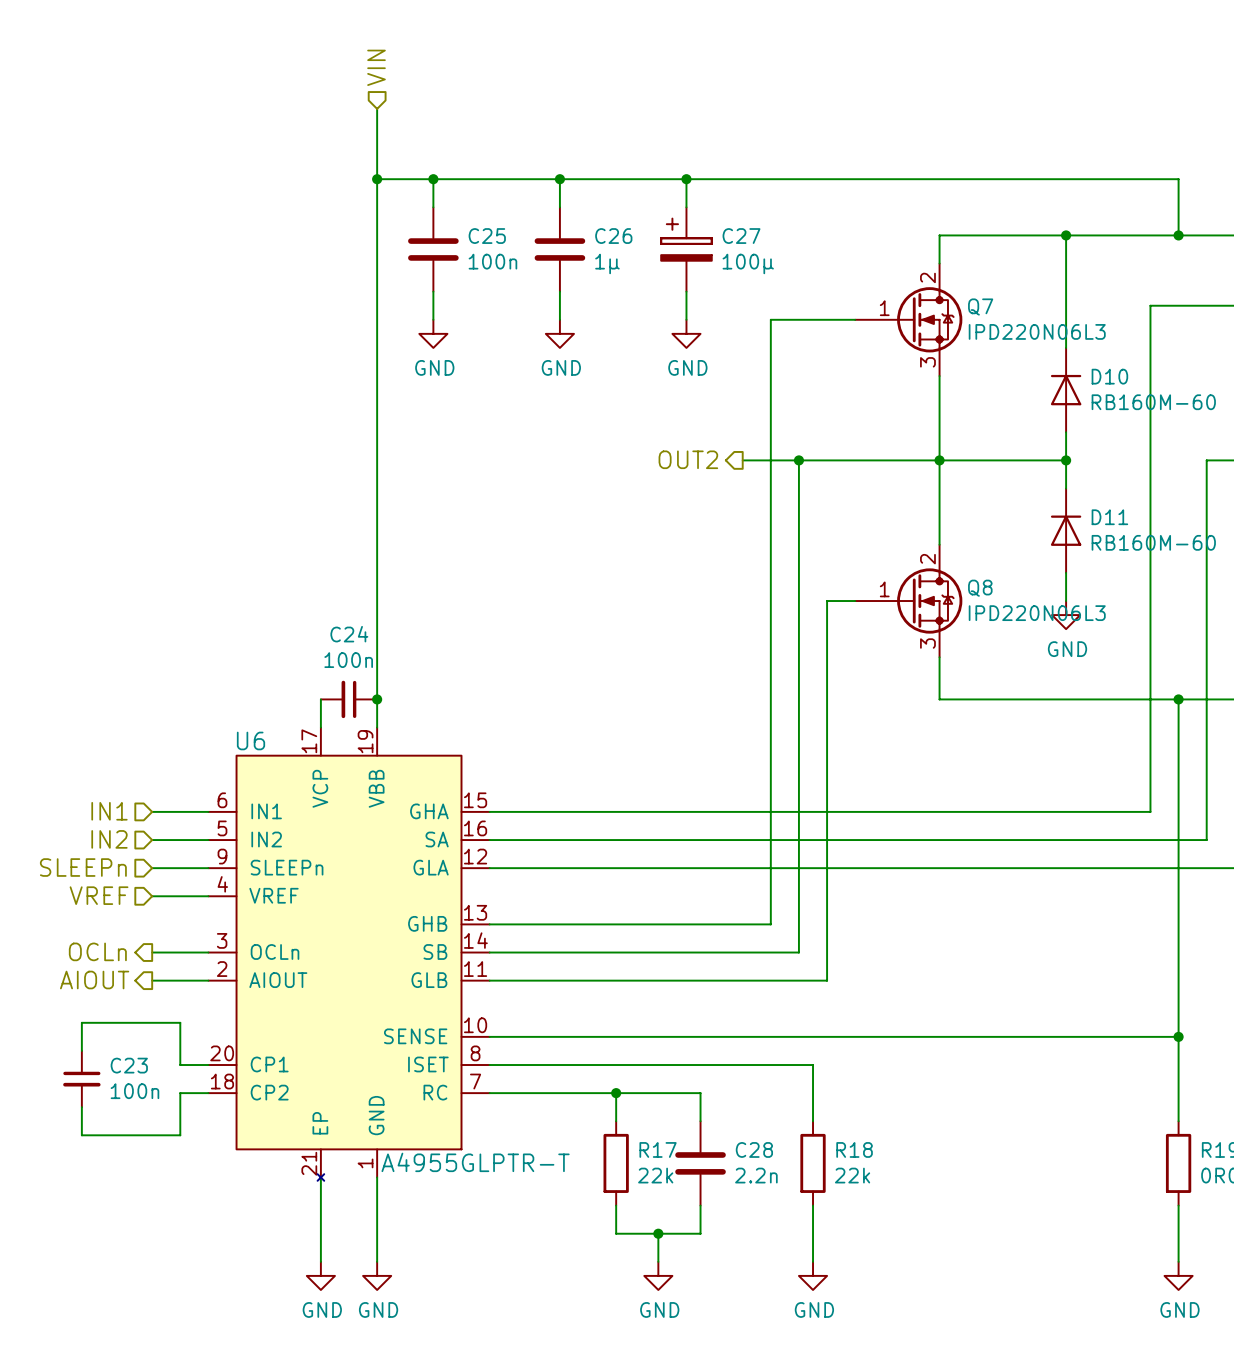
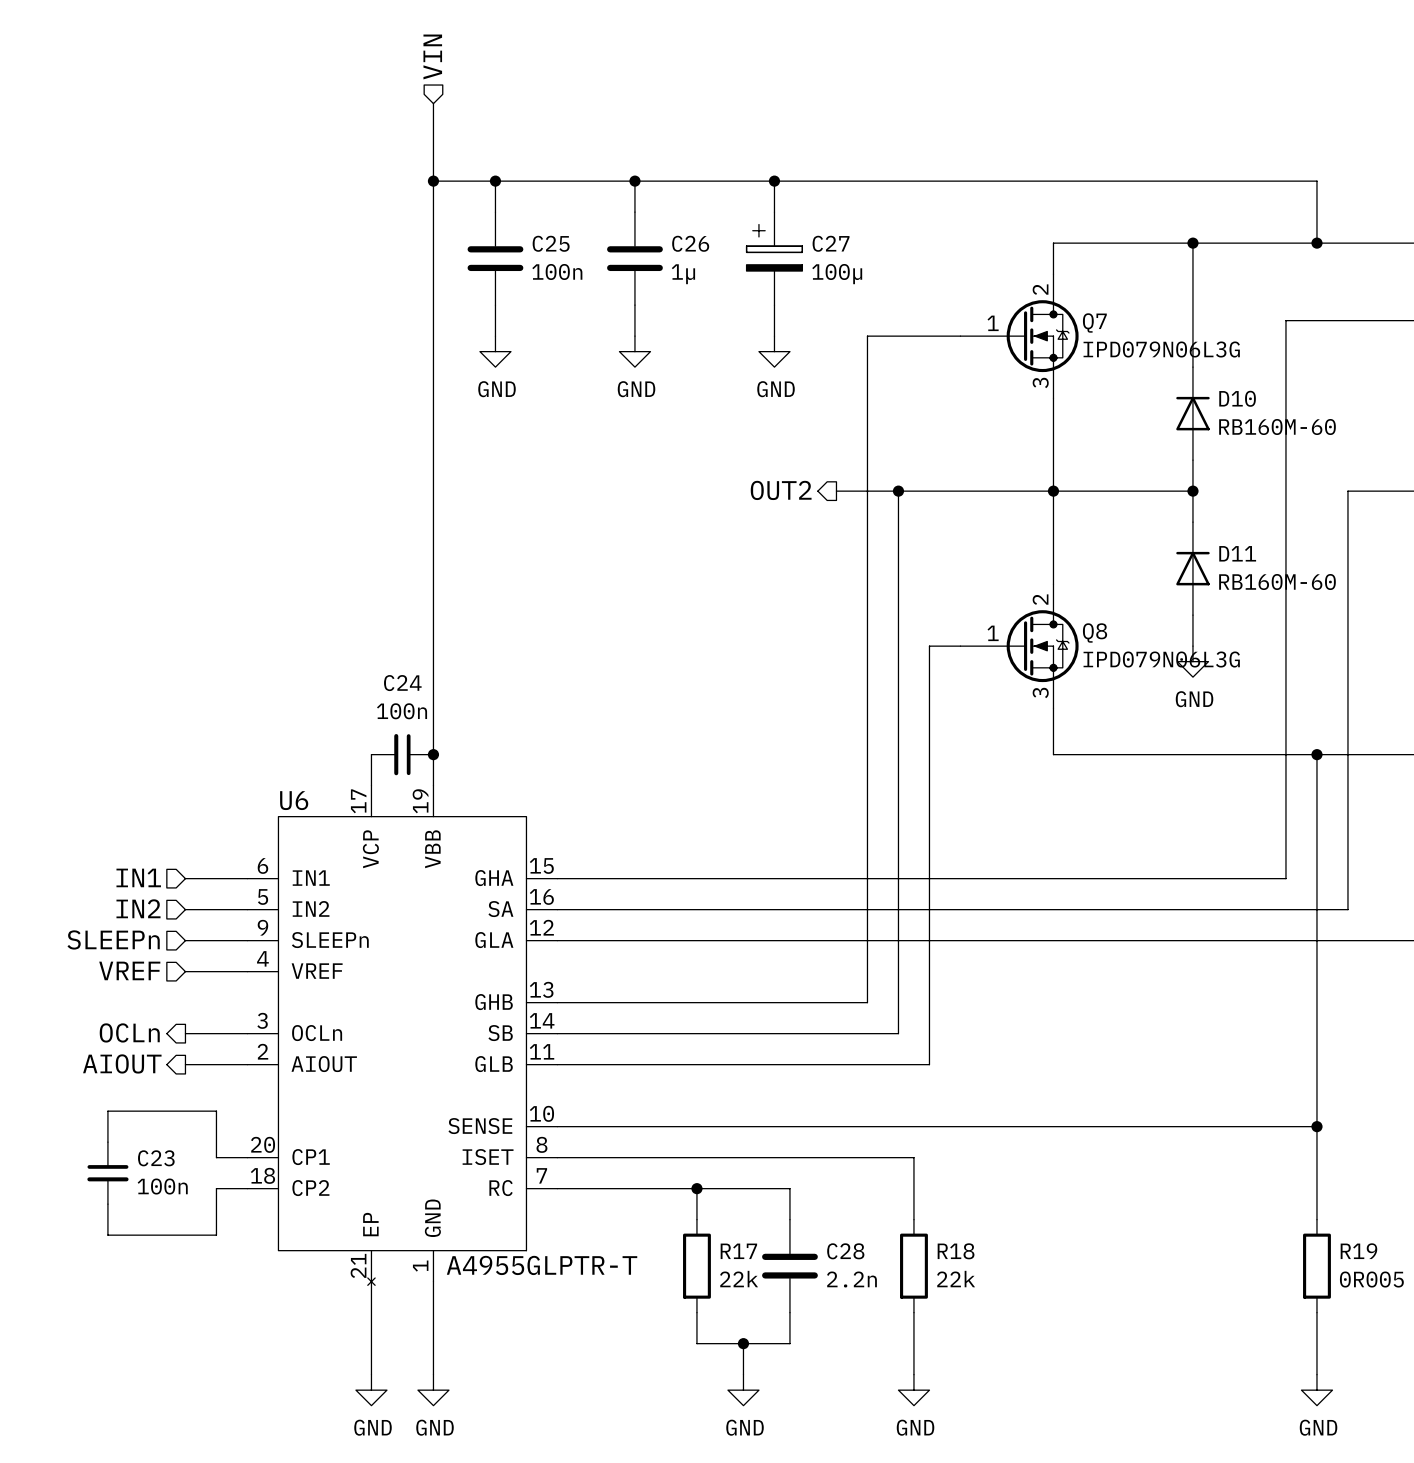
Q7 value: IPD220N06L3 (1037, 331) -> IPD079N06L3G (1161, 349)
Q8 value: IPD220N06L3 (1037, 613) -> IPD079N06L3G (1161, 659)

